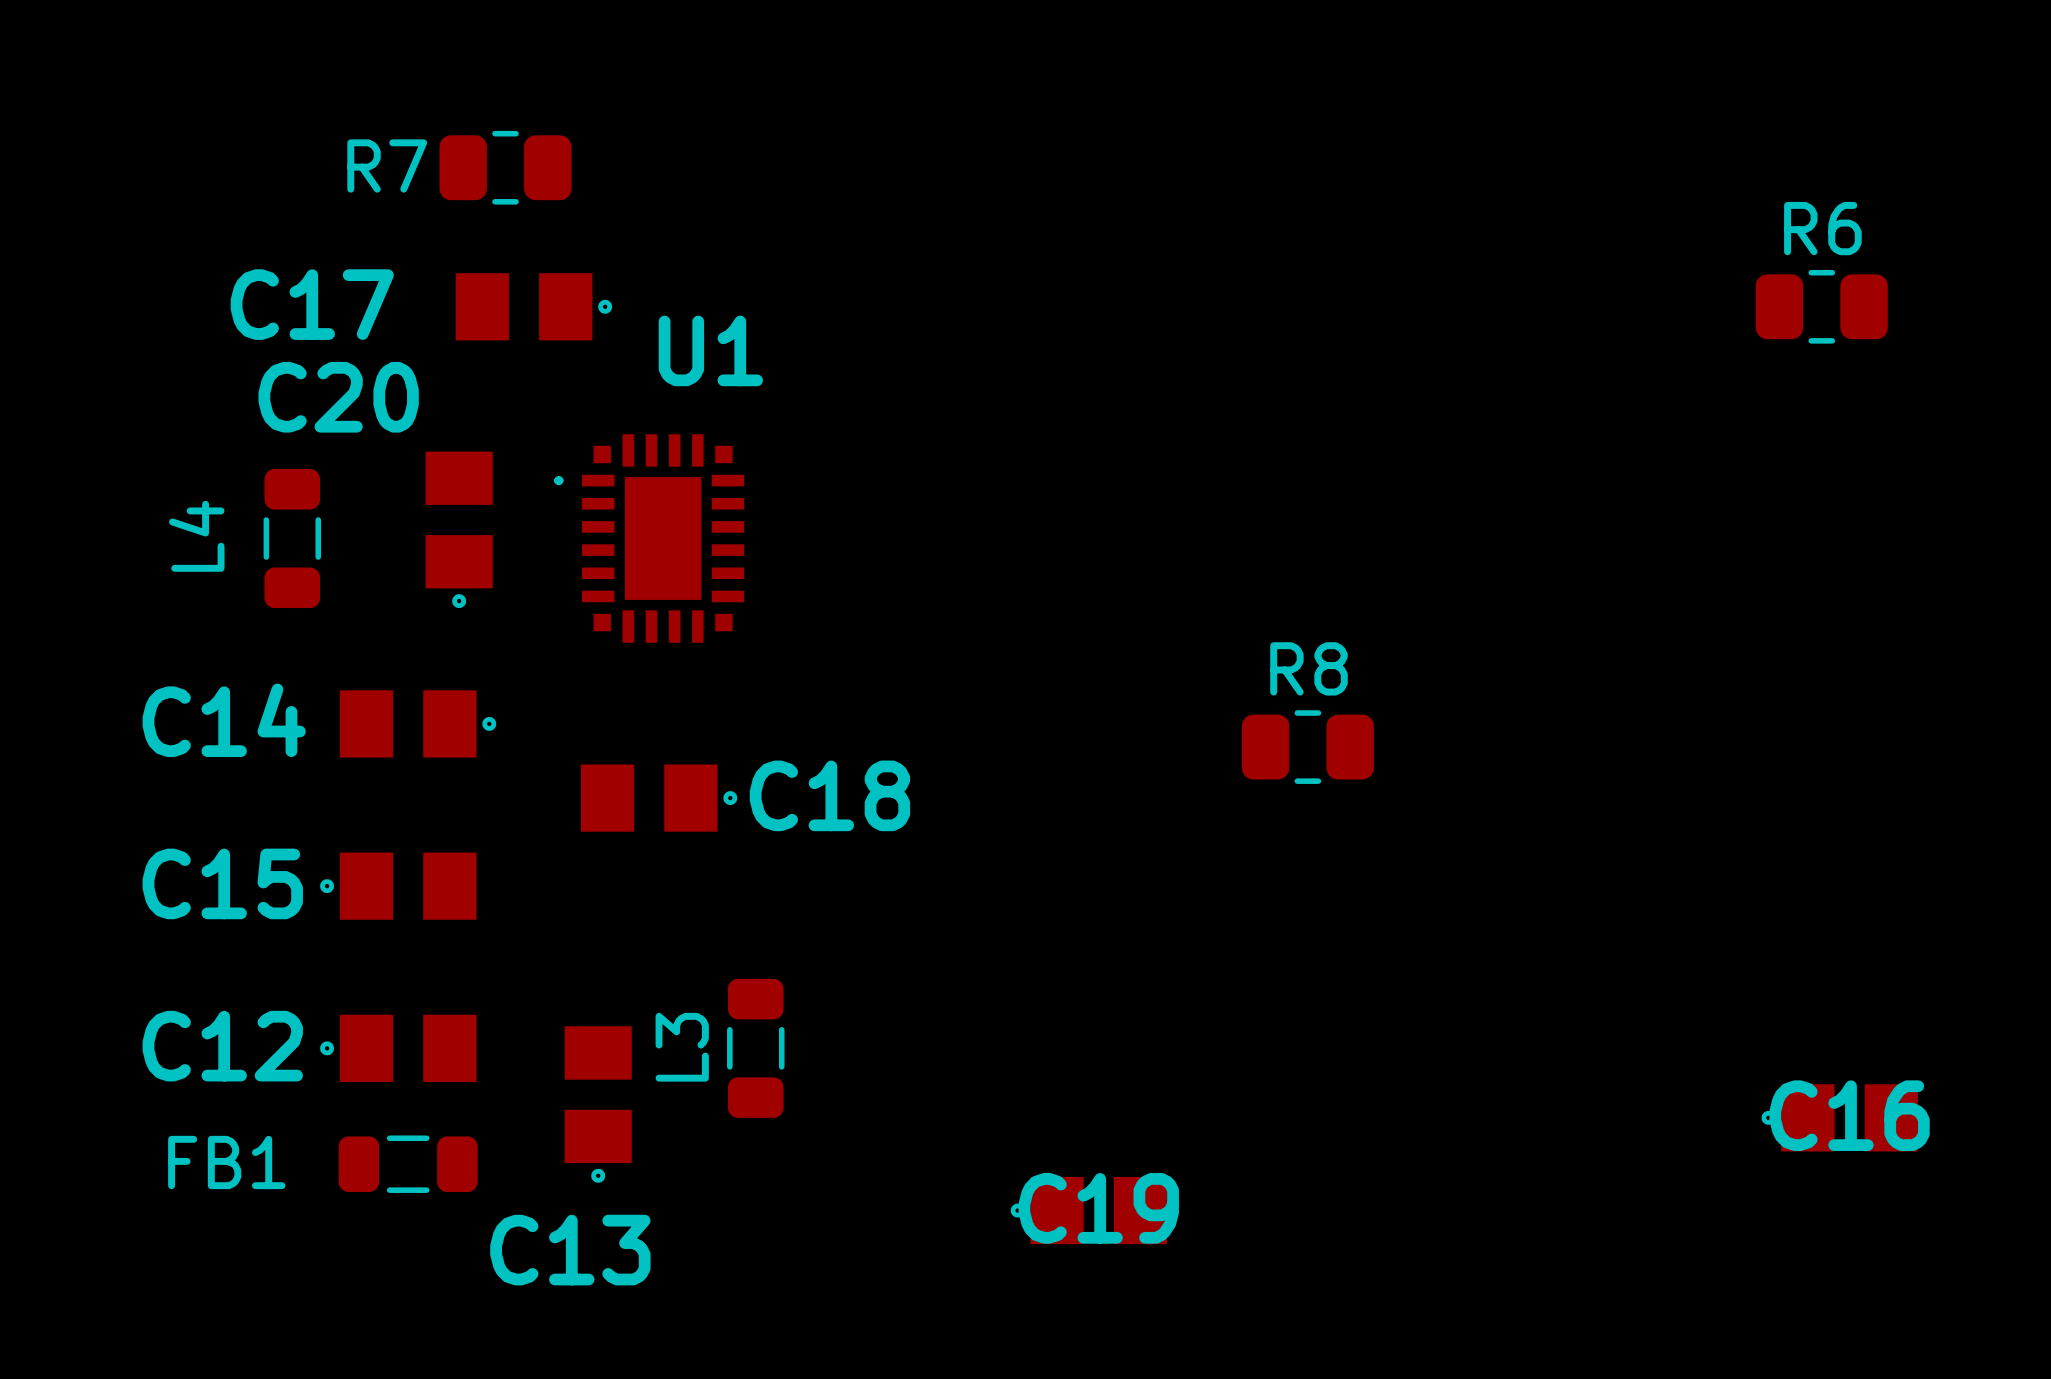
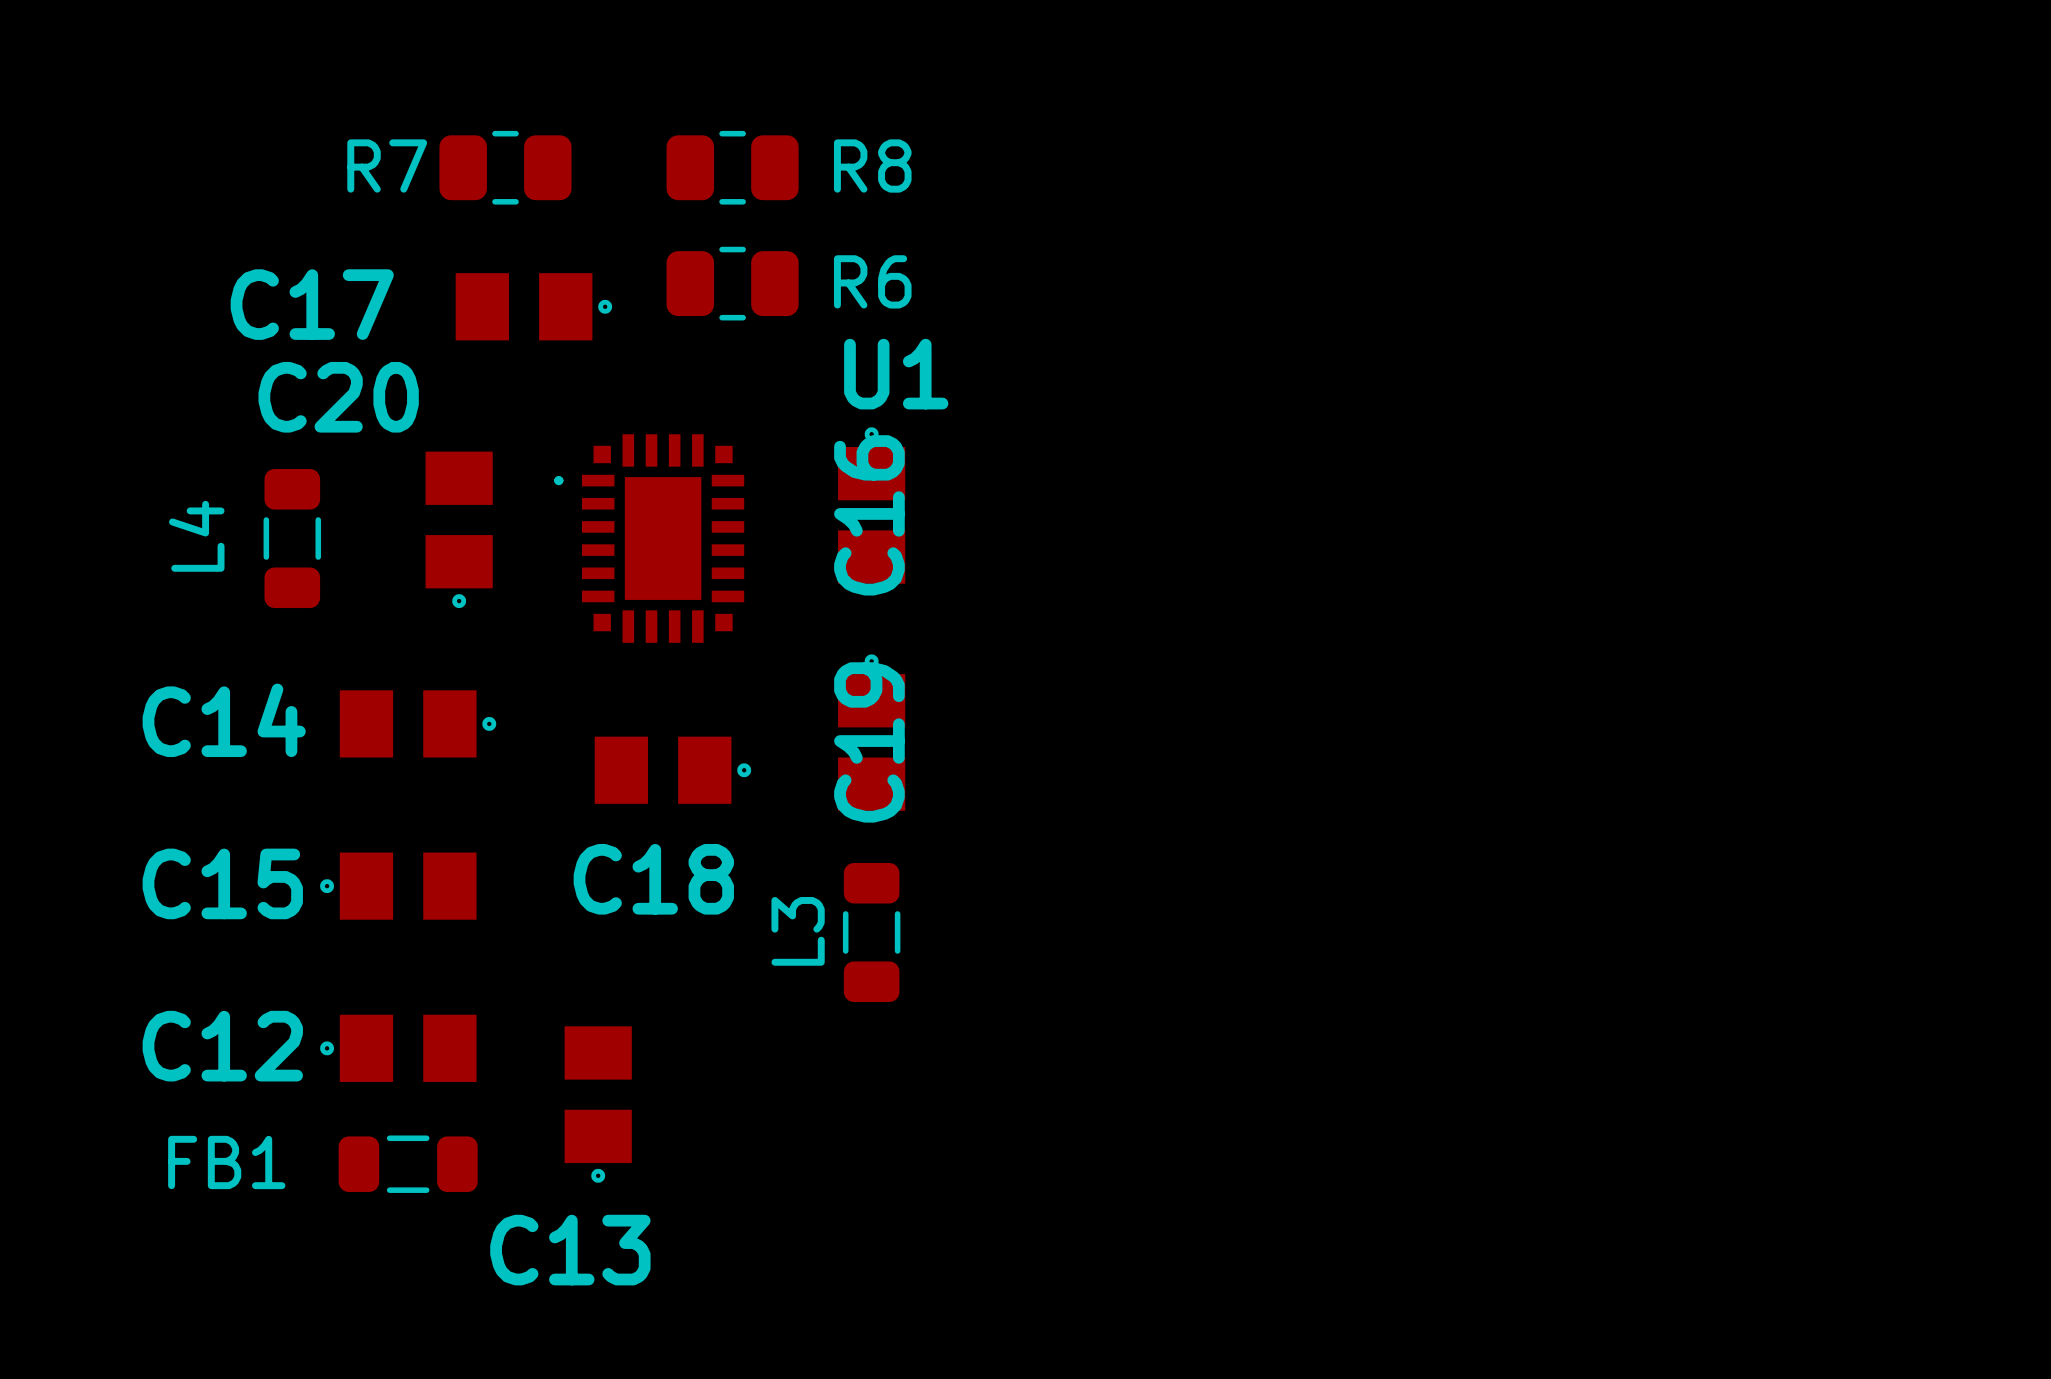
R6 name position: R6 (1822, 228) -> R6 (872, 281)
R6 position: (1821, 306) -> (732, 283)
U1 name position: U1 (710, 350) -> U1 (896, 374)
R8 name position: R8 (1309, 668) -> R8 (872, 166)
R8 position: (1307, 747) -> (732, 167)
C18 name position: C18 (829, 795) -> C18 (653, 879)
C18 position: (659, 798) -> (672, 770)
L3 position: (755, 1048) -> (871, 932)
C16 rotation: 0° (1839, 1117) -> 90° clockwise (871, 505)
C16 position: (1839, 1117) -> (871, 505)
C19 rotation: 0° (1088, 1210) -> 90° clockwise (871, 732)
C19 position: (1088, 1210) -> (871, 732)

